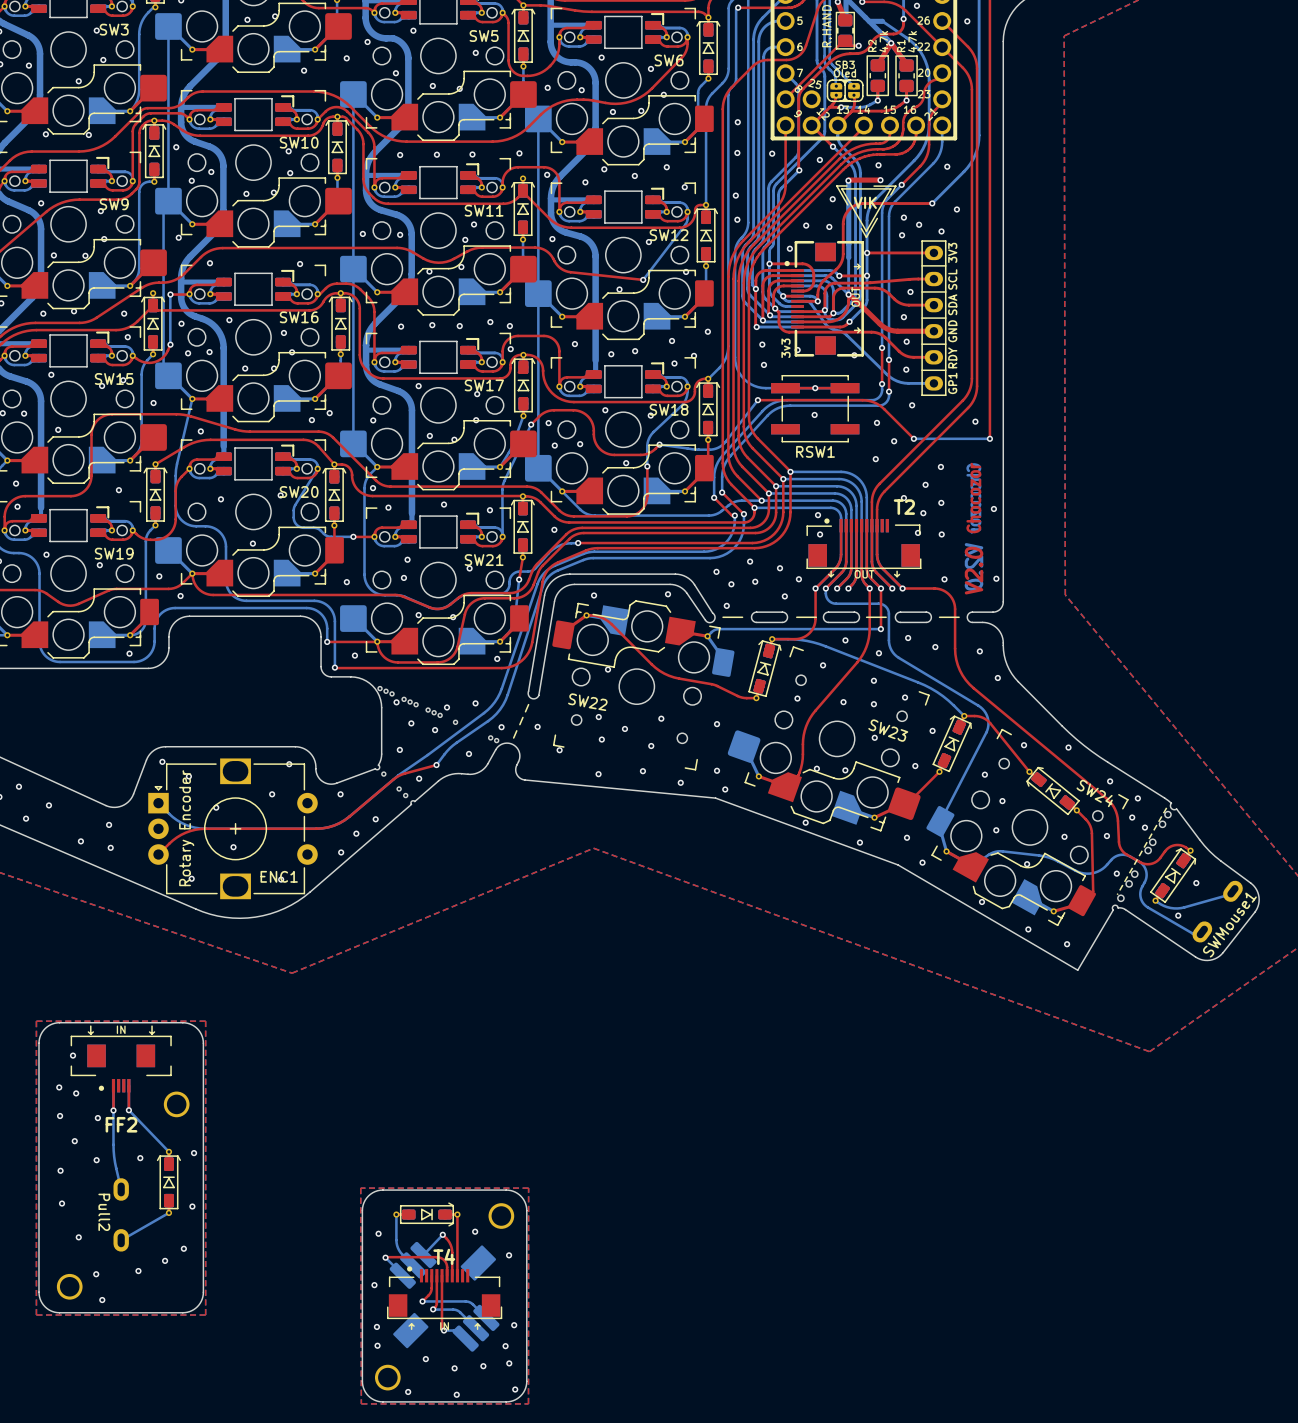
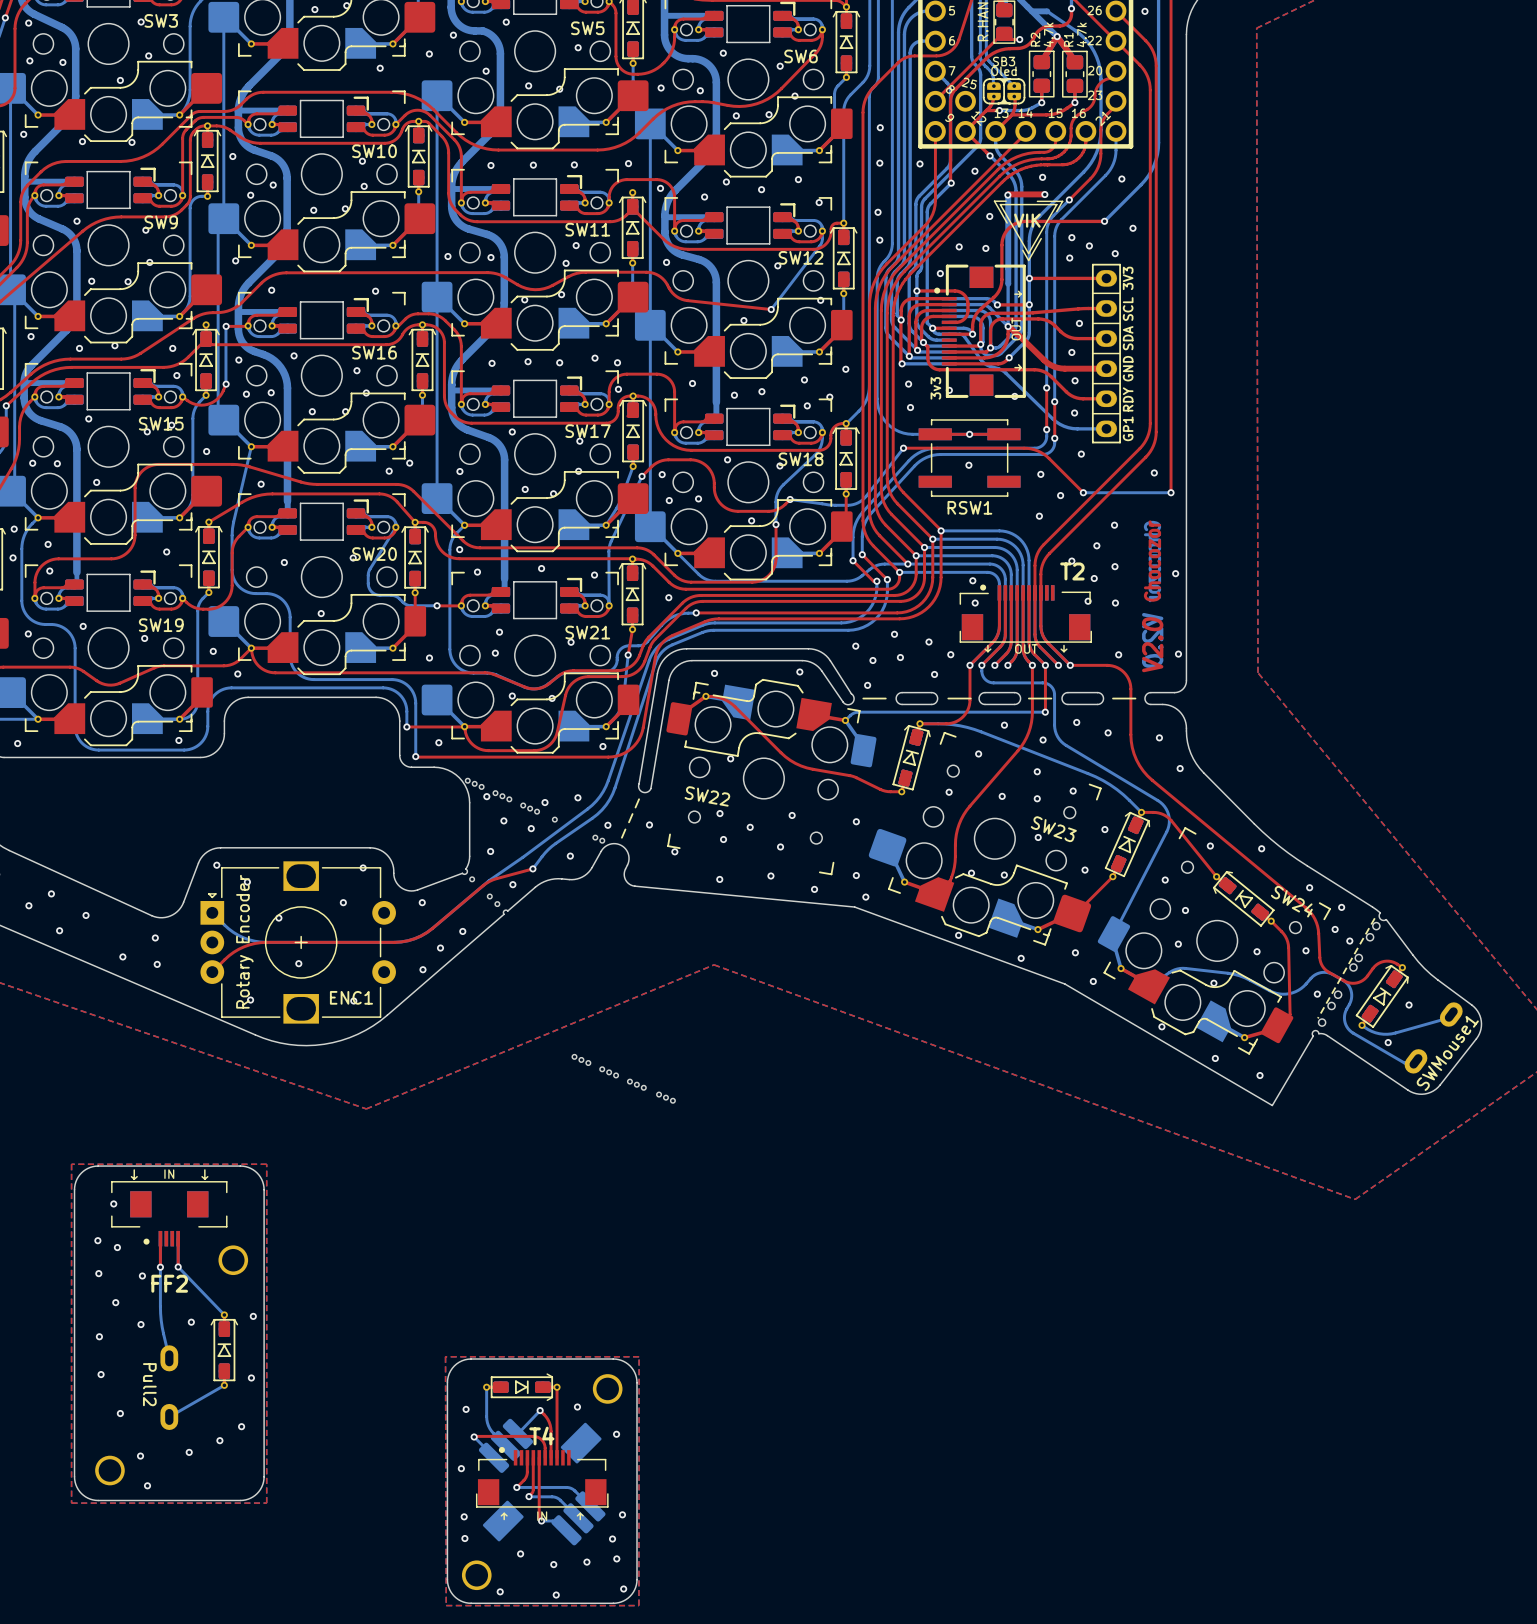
round board edge: none -> [571, 1054, 578, 1060]
round board edge: none -> [578, 1057, 585, 1063]
round board edge: none -> [585, 1060, 592, 1066]
round board edge: none -> [599, 1066, 606, 1073]
round board edge: none -> [606, 1069, 613, 1076]
round board edge: none -> [613, 1072, 619, 1079]
round board edge: none -> [627, 1078, 633, 1085]
round board edge: none -> [634, 1081, 640, 1088]
round board edge: none -> [640, 1084, 647, 1091]
round board edge: none -> [656, 1091, 662, 1098]
round board edge: none -> [663, 1094, 669, 1101]
round board edge: none -> [670, 1097, 676, 1104]

